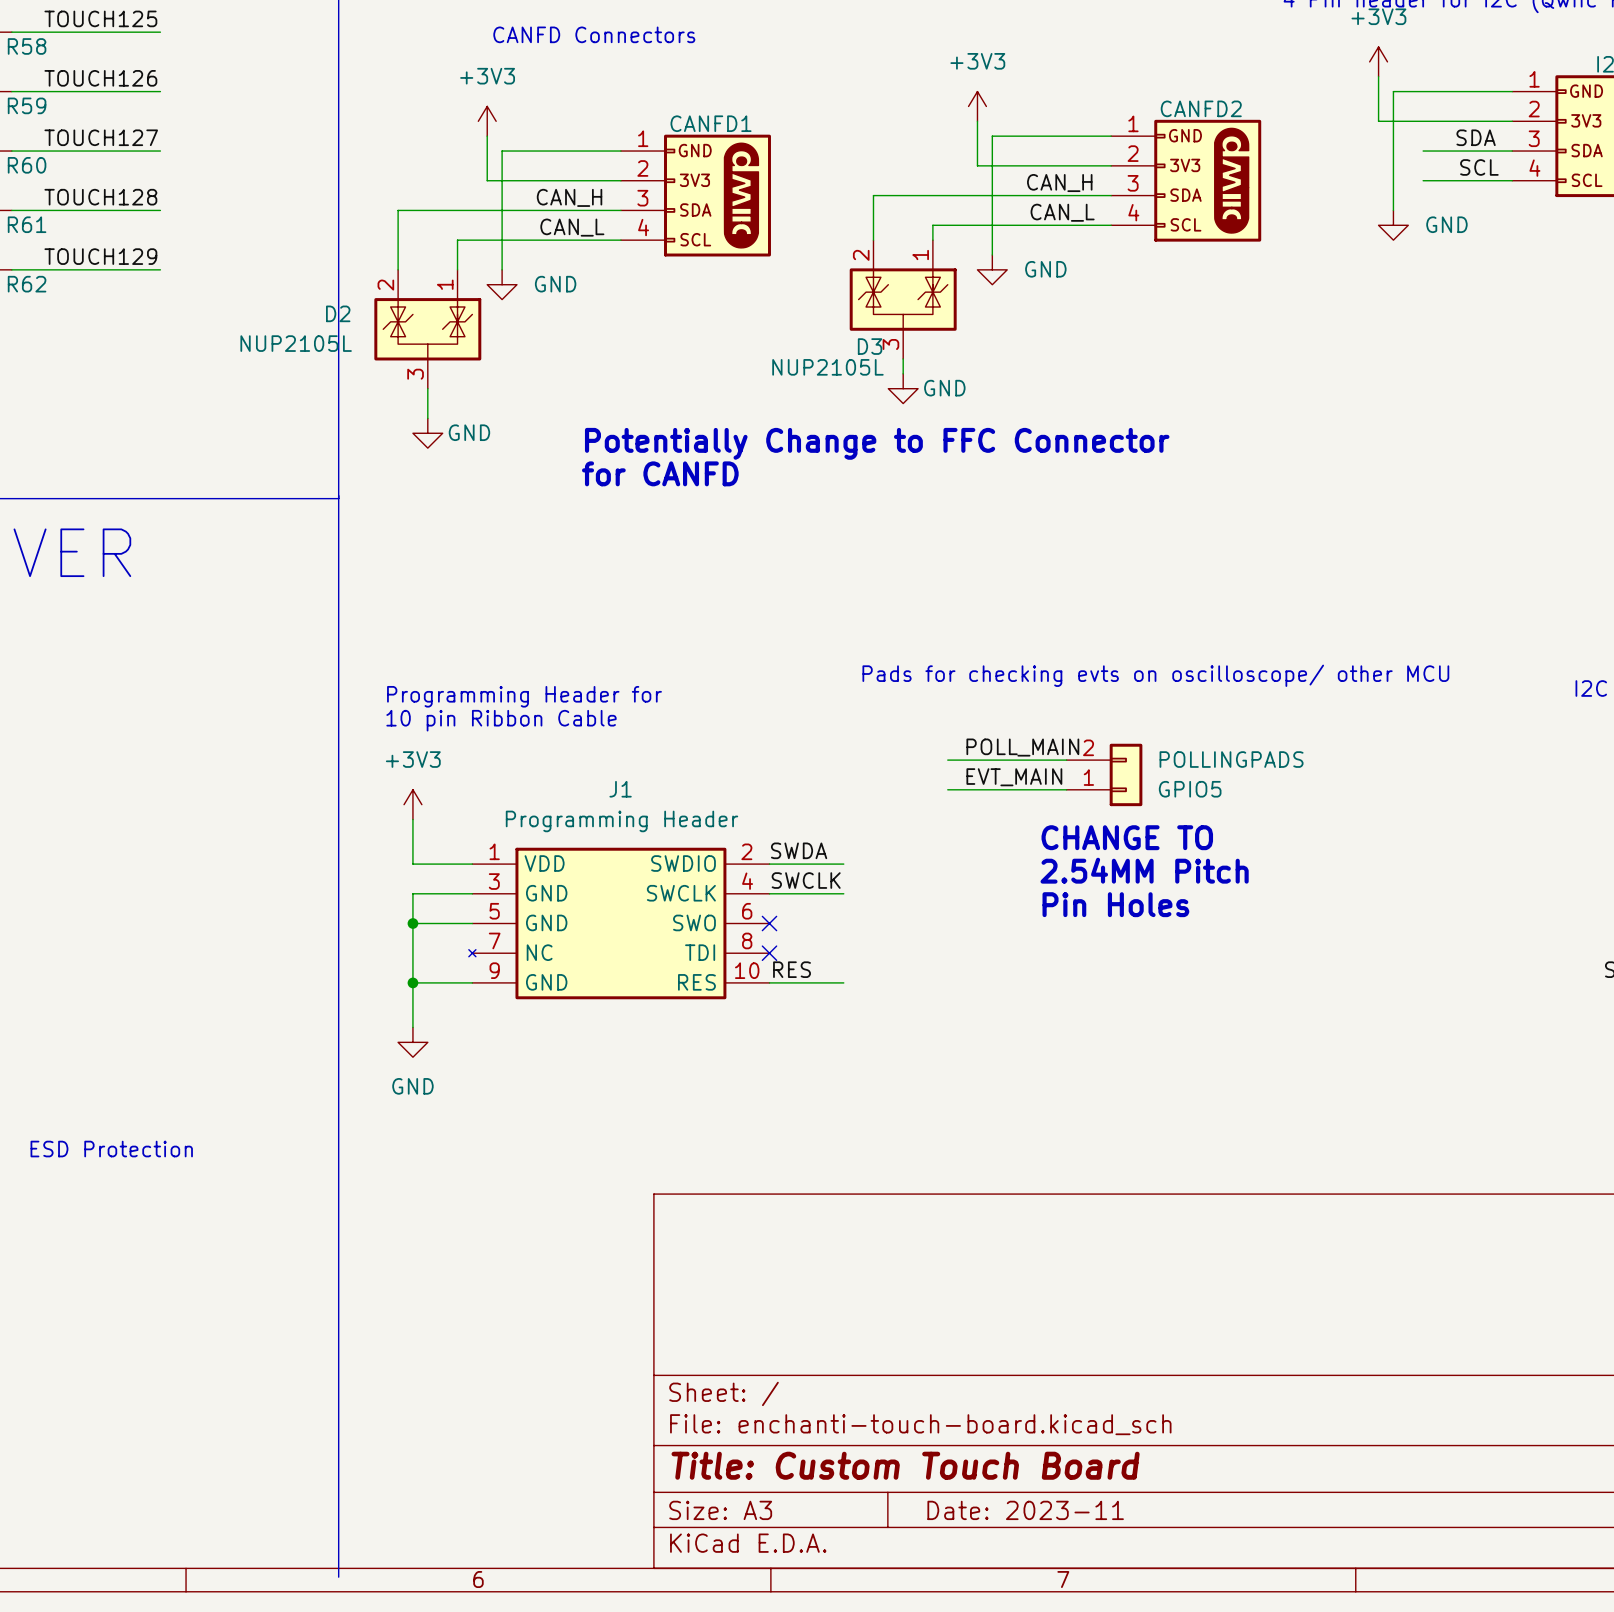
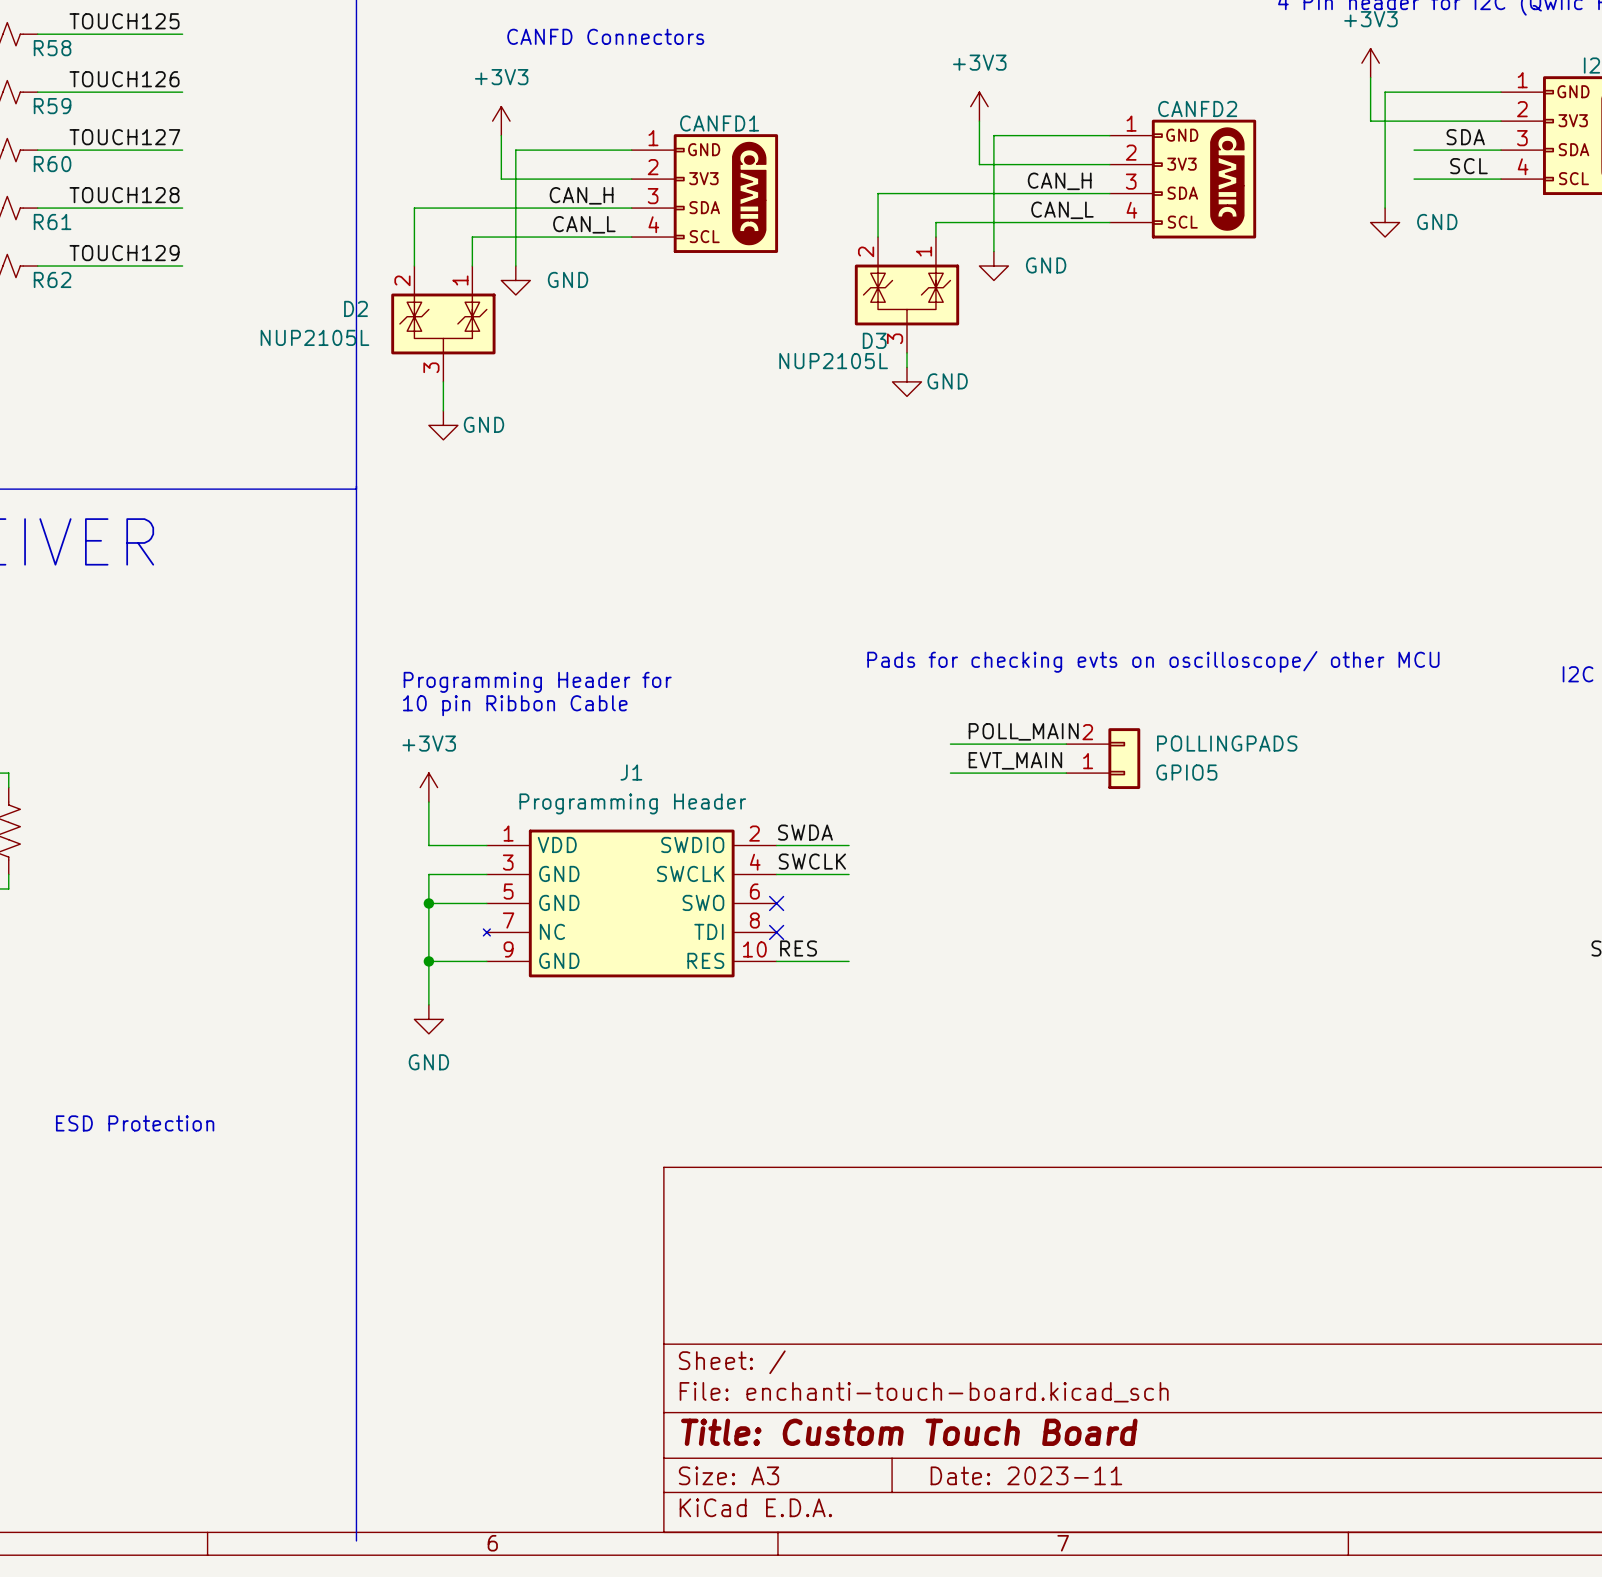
text: Potentially Change to FFC Connector (877, 443) -> none
text: for CANFD (660, 473) -> none
text: CHANGE TO (1127, 837) -> none
text: 2.54MM Pitch (1144, 870) -> none
text: Pin Holes (1115, 904) -> none

